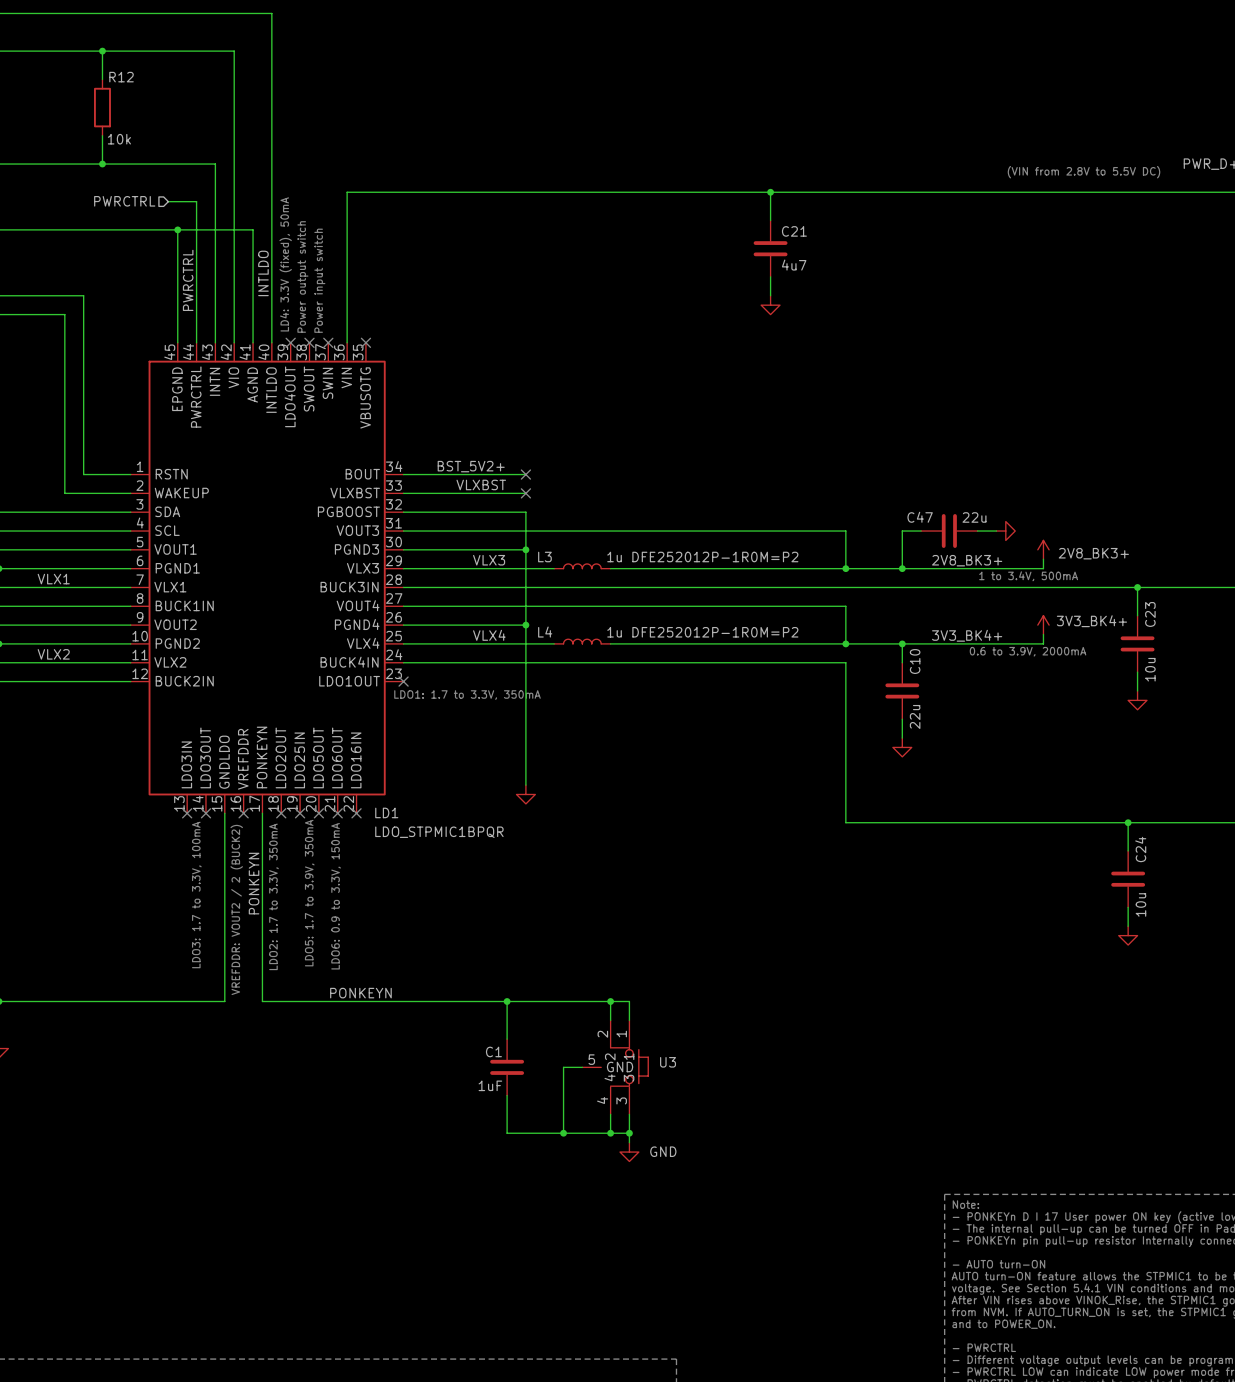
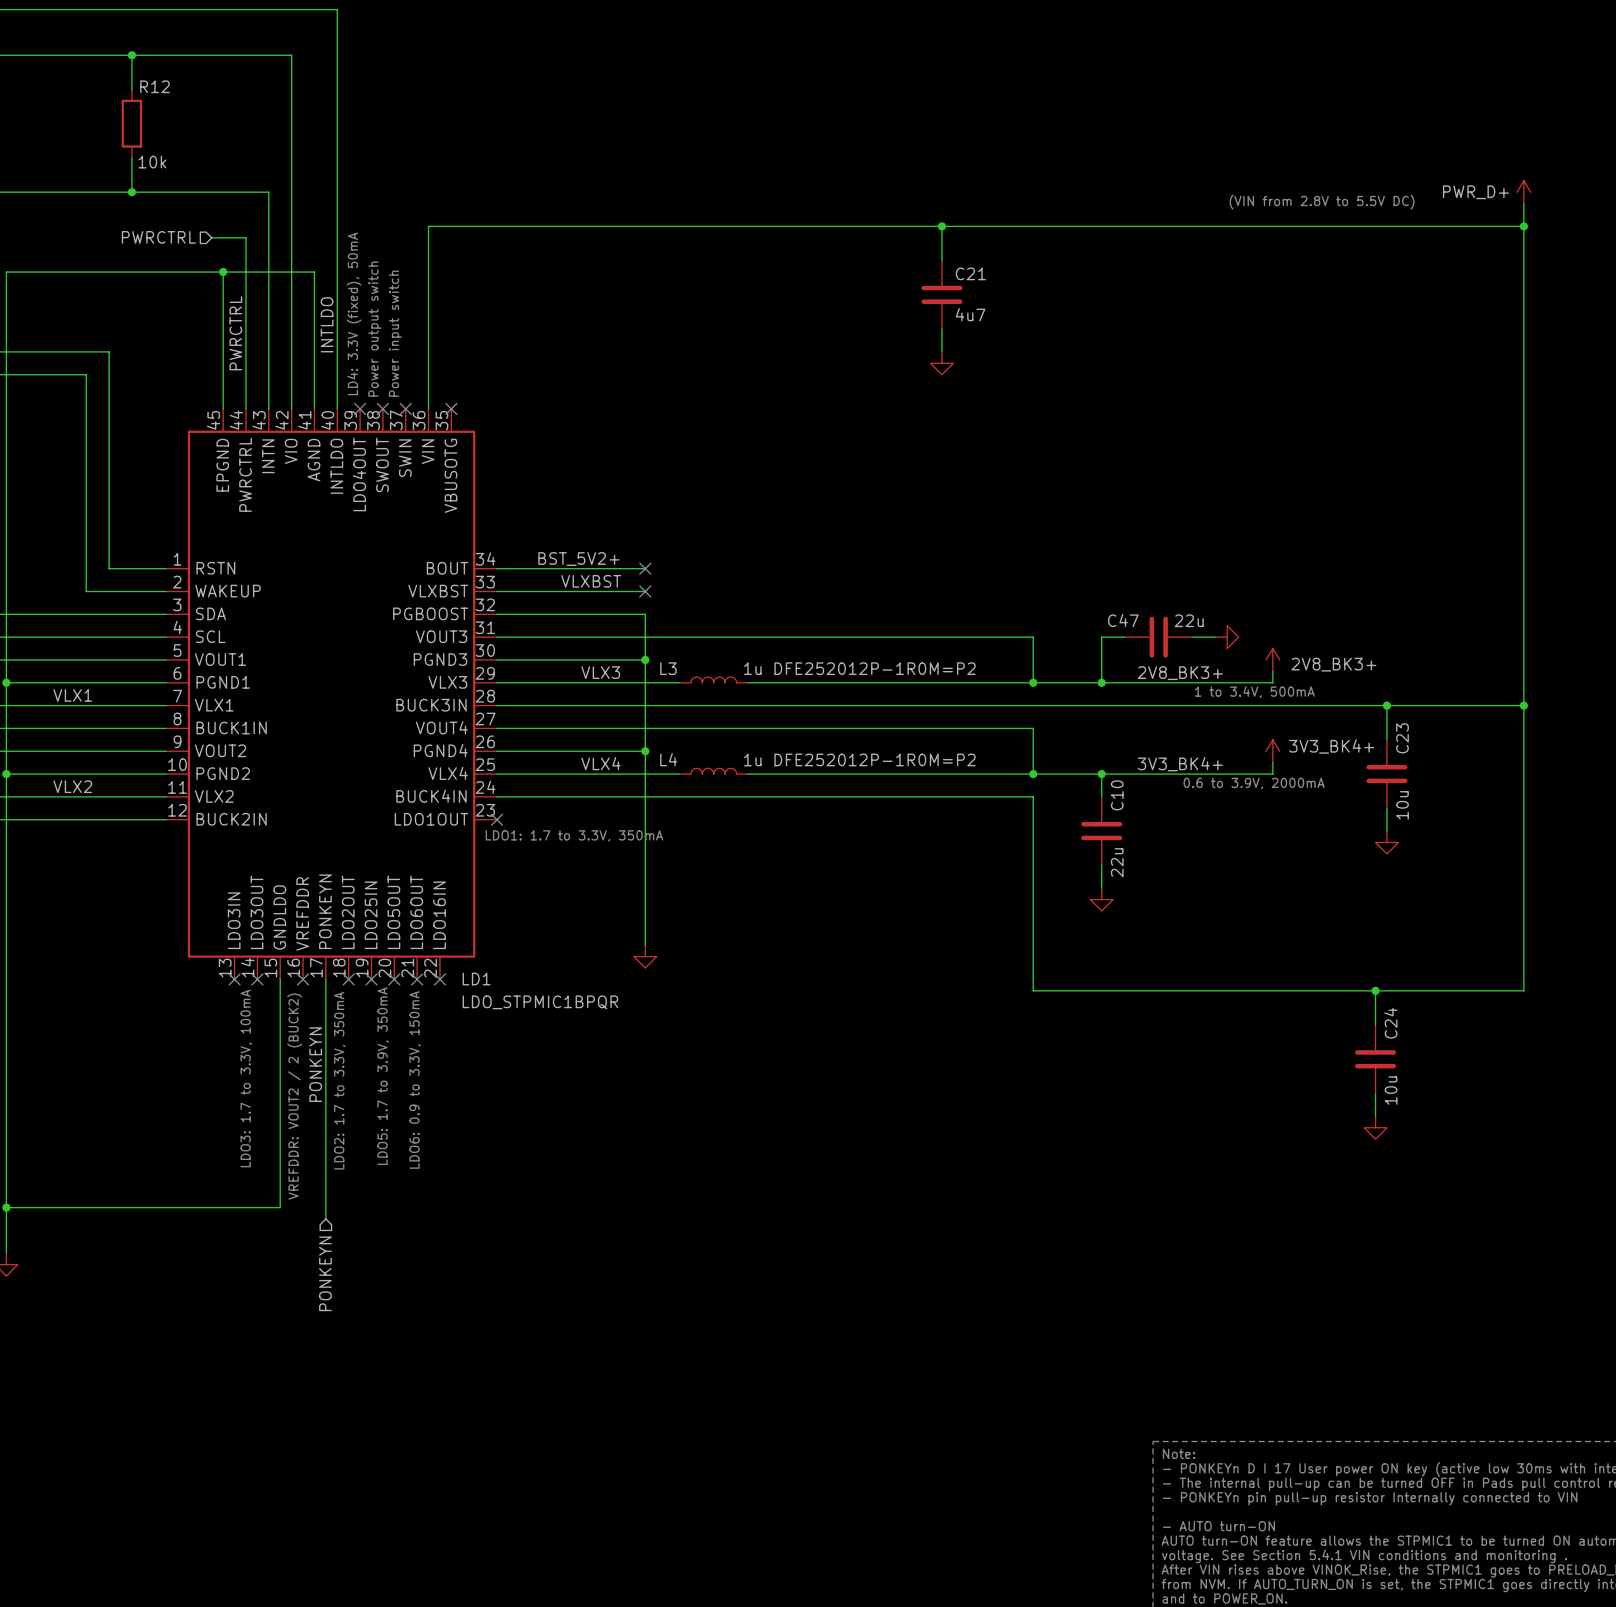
label: PONKEYN (360, 993) -> none
wire: (262, 1001) (629, 1001) (629, 1020) -> (325, 1207) (325, 1219)
wire: (507, 1001) (507, 1039) -> none
junction: (507, 1001) -> none
wire: (610, 1001) (610, 1020) -> none
junction: (610, 1001) -> none
hierarchical label: none -> PONKEYN (325, 1273)
C1: 1uF (507, 1067) -> none
wire: (582, 1067) (563, 1067) (563, 1133) -> none
U3: (615, 1067) -> none
wire: (507, 1095) (507, 1133) (629, 1133) -> none
wire: (610, 1114) (610, 1133) -> none
wire: (629, 1114) (629, 1142) -> none
junction: (563, 1133) -> none
junction: (610, 1133) -> none
junction: (629, 1133) -> none
power symbol: GND (629, 1152) -> none

